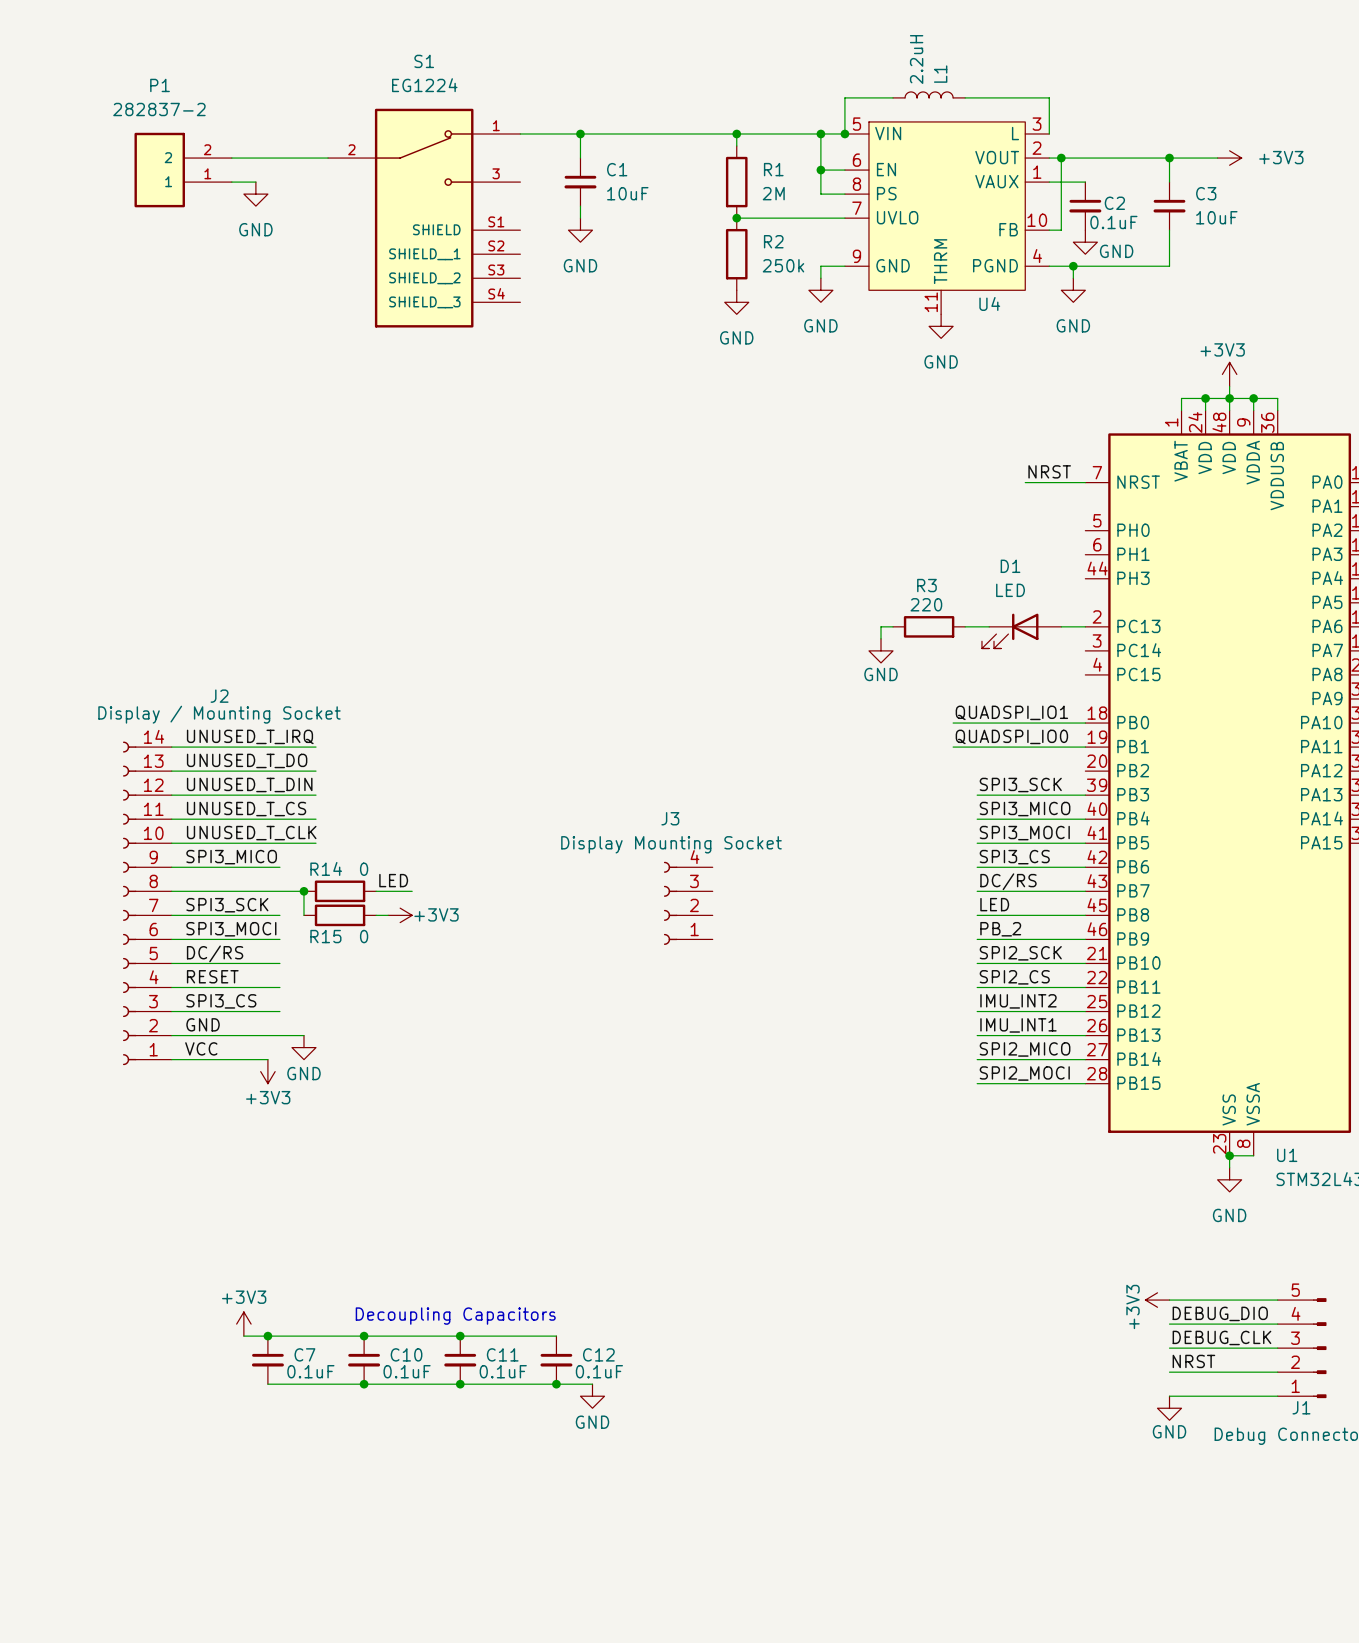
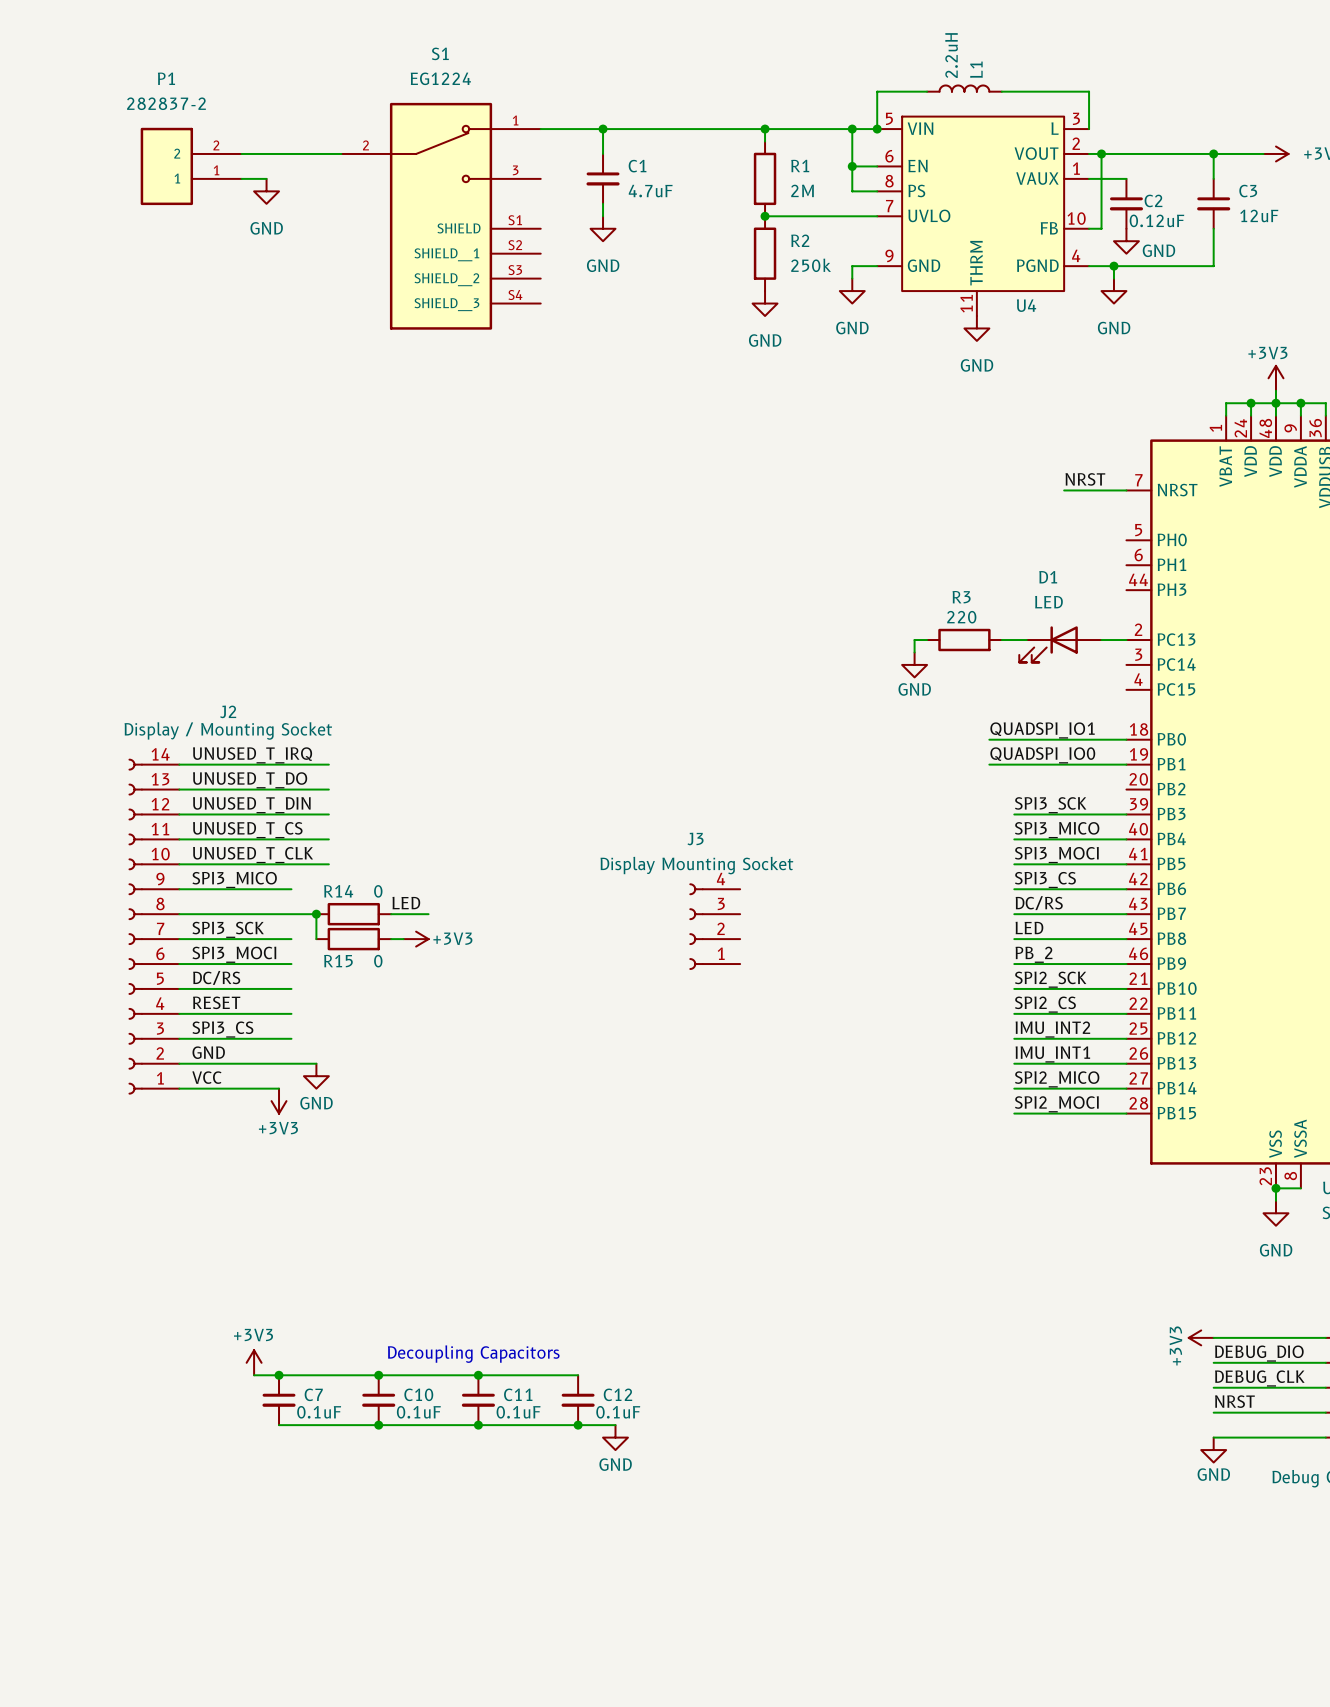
C1 value: 10uF (627, 193) -> 4.7uF (650, 191)
C3 value: 10uF (1216, 217) -> 12uF (1259, 215)
C2 value: 0.1uF (1113, 222) -> 0.12uF (1156, 220)

